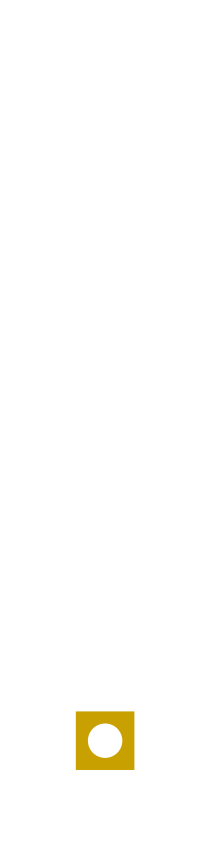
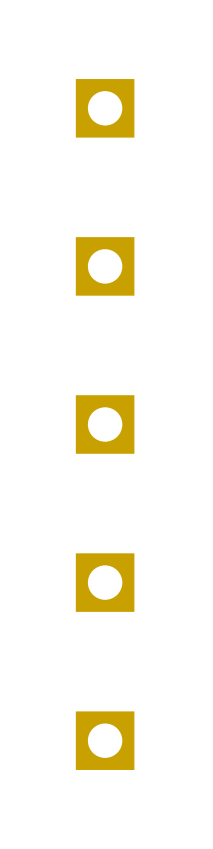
part: none -> (105, 108)
part: none -> (105, 266)
part: none -> (105, 424)
part: none -> (105, 582)

